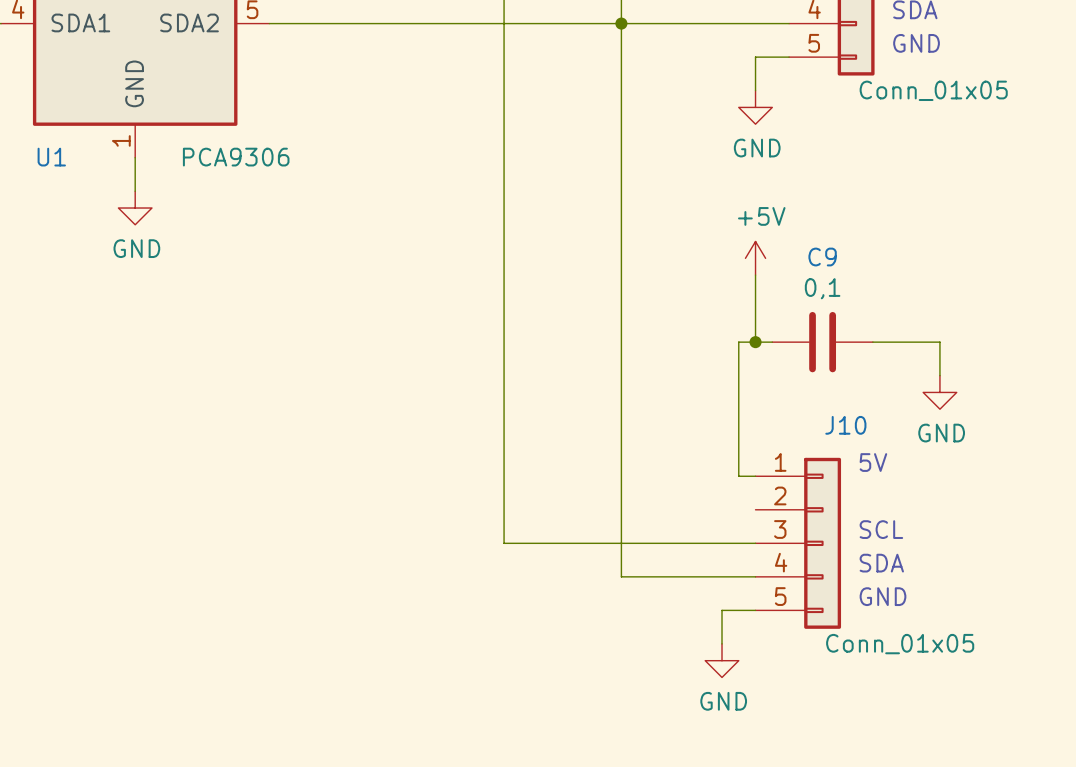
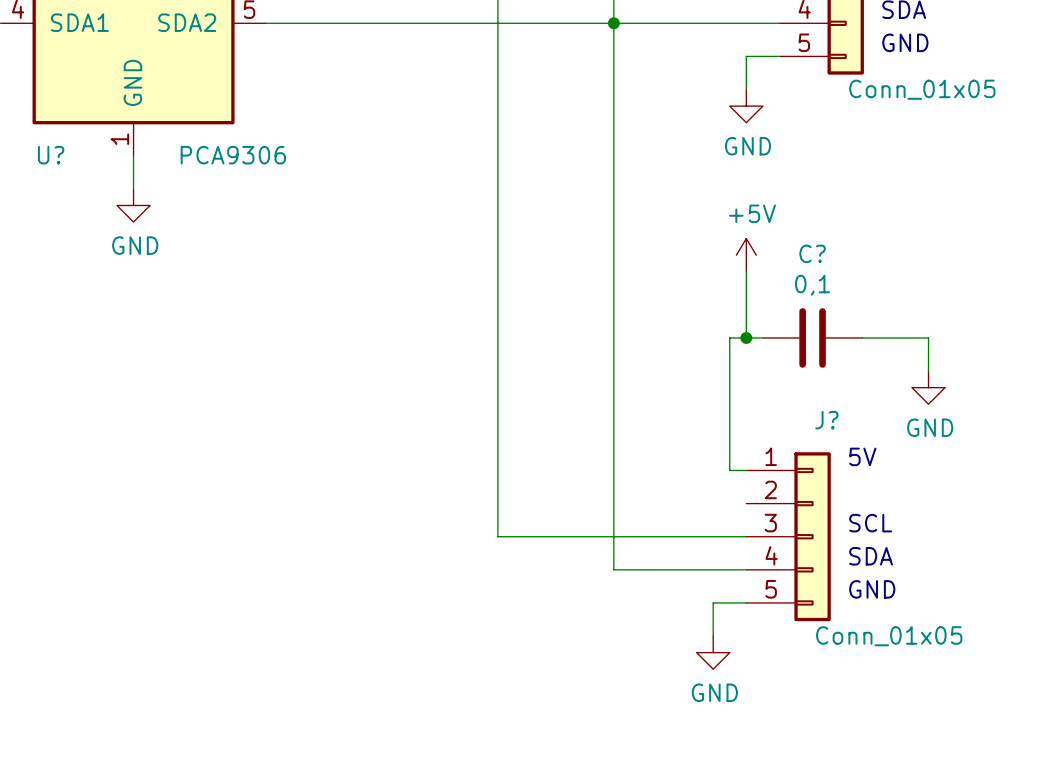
U1 name: U1 (51, 157) -> U? (51, 155)
C9 name: C9 (822, 257) -> C? (812, 253)
J10 name: J10 (845, 425) -> J? (826, 420)

